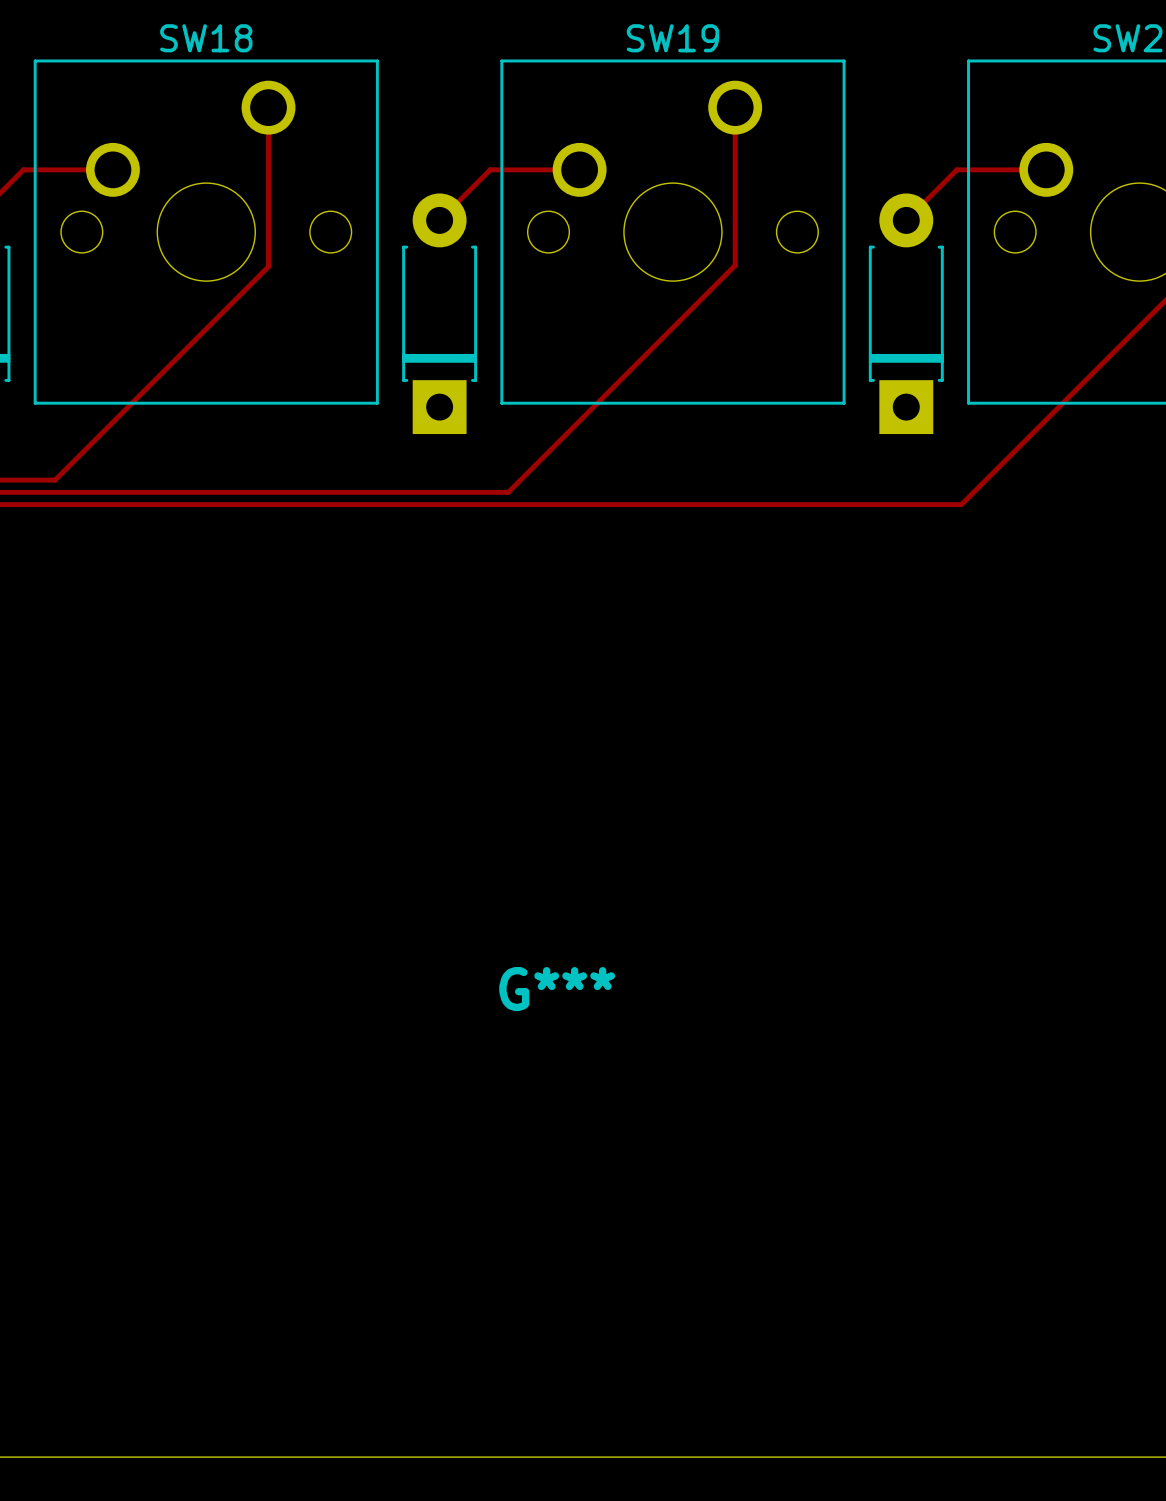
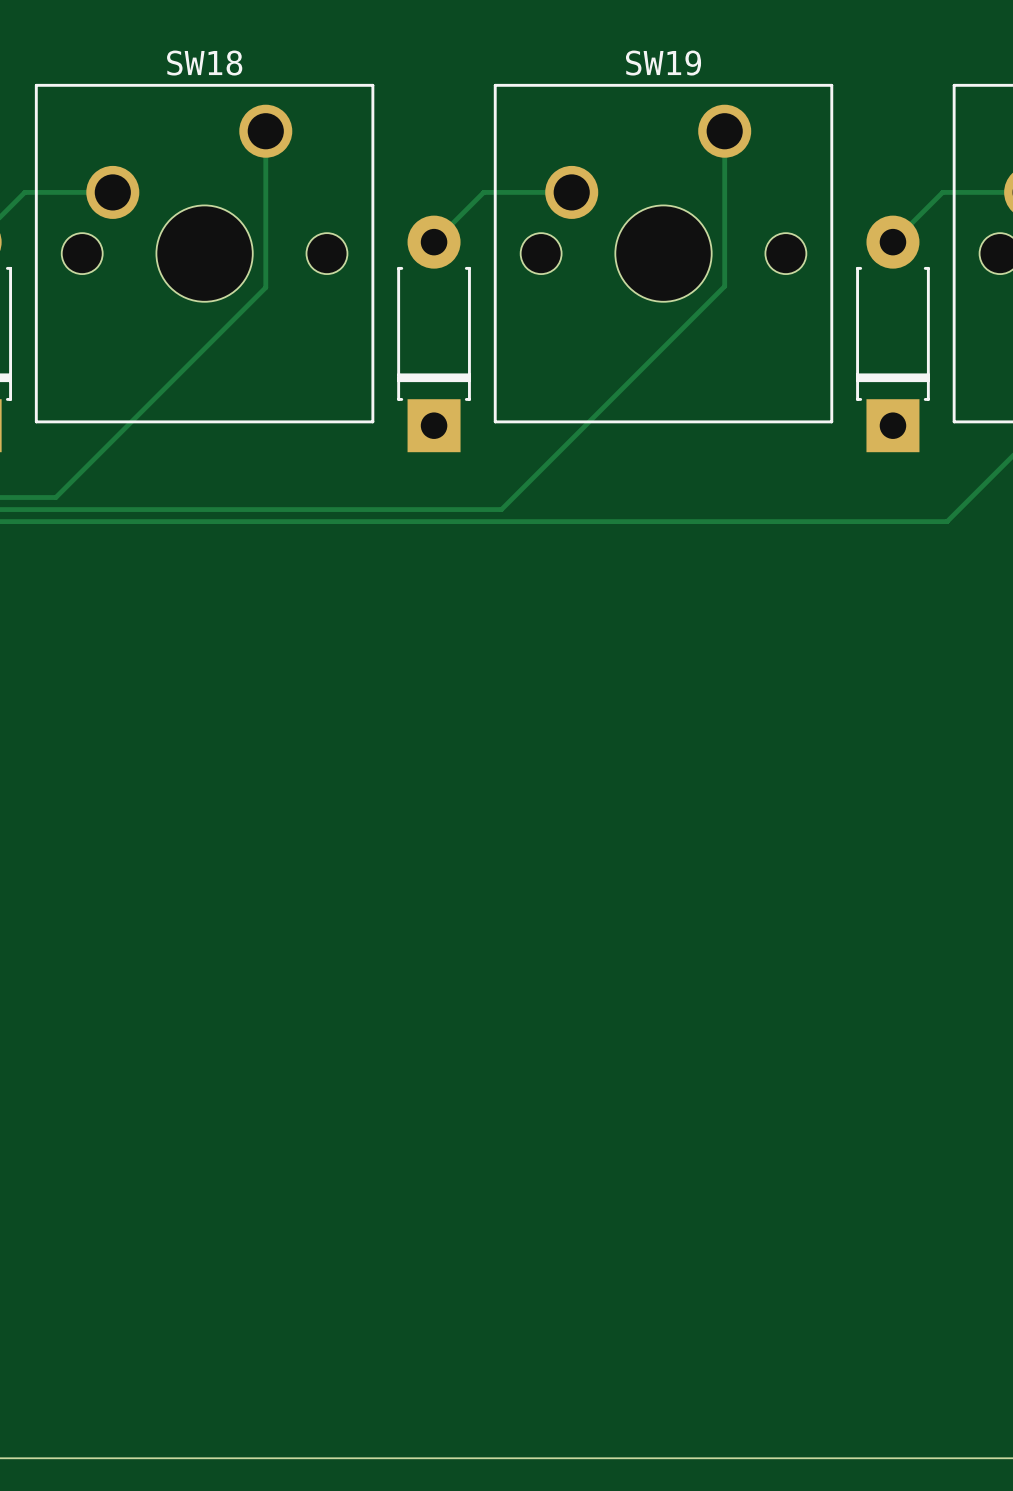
G***: (557, 989) -> none

